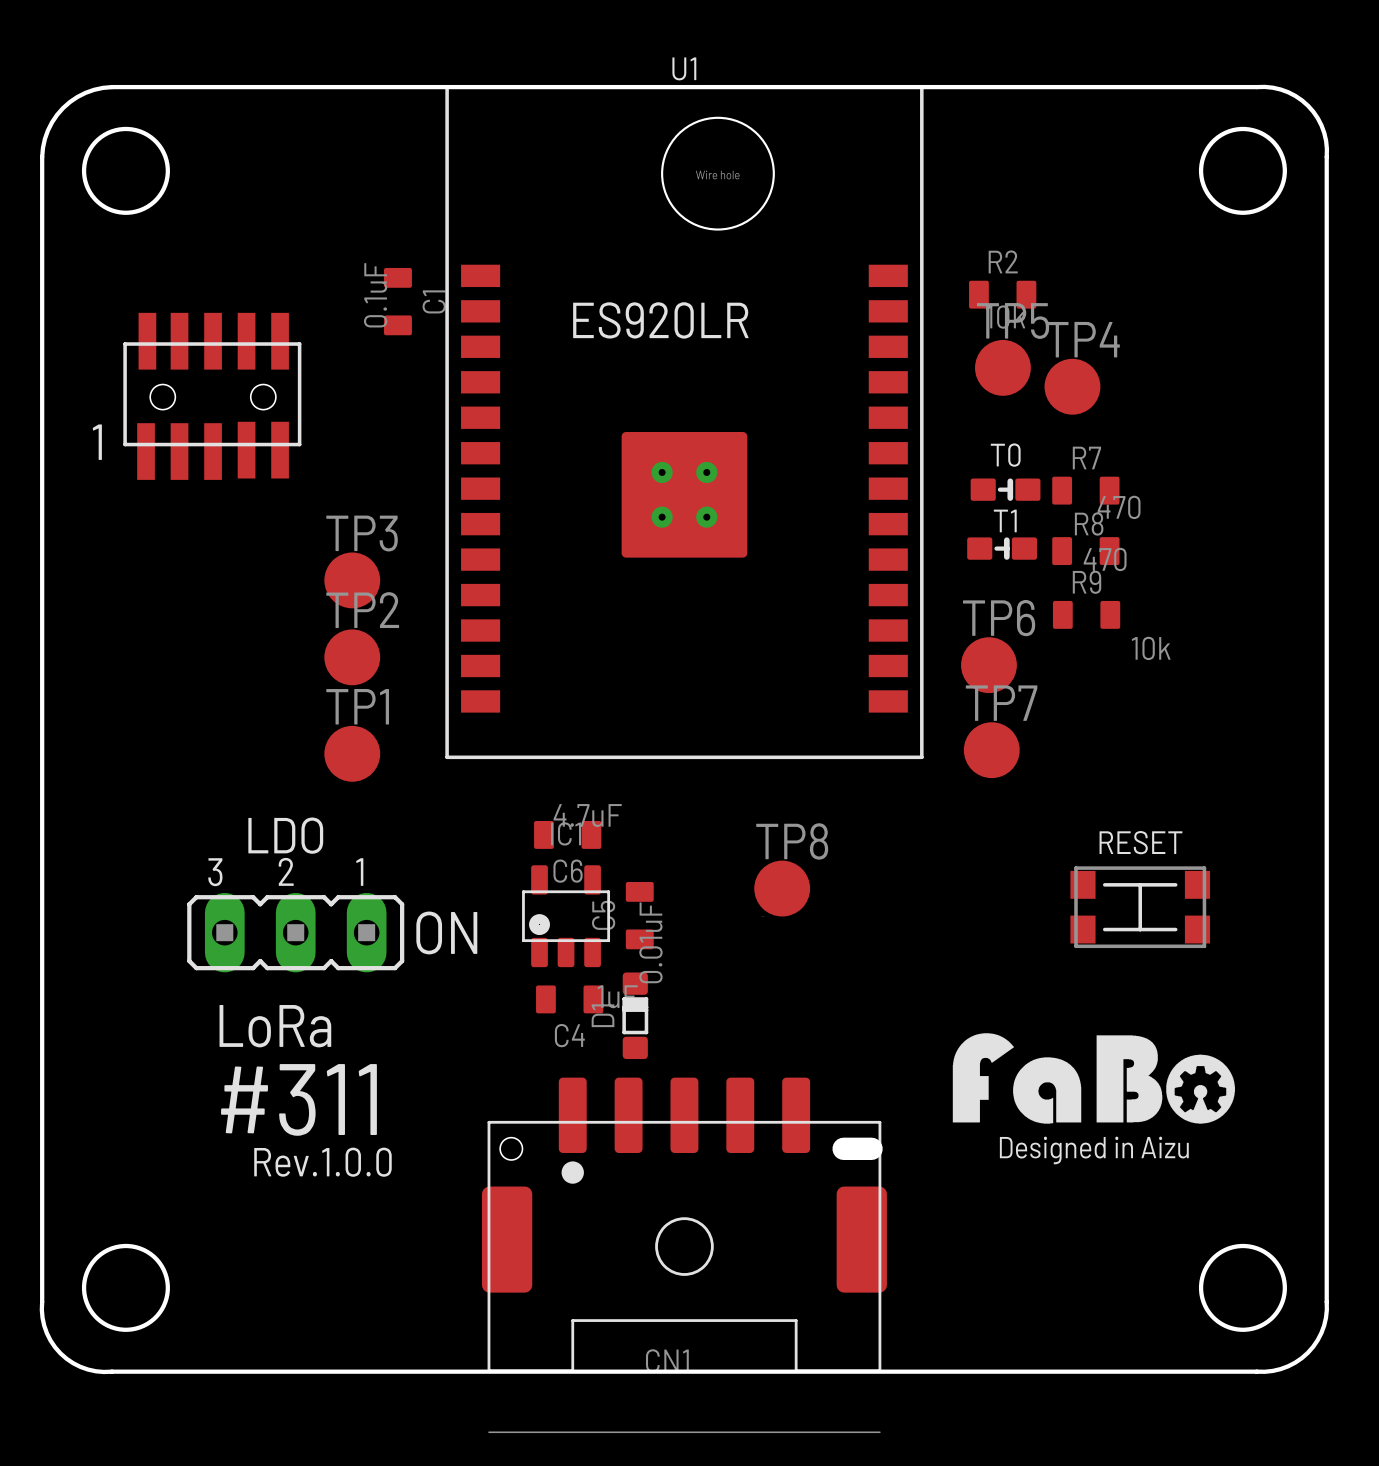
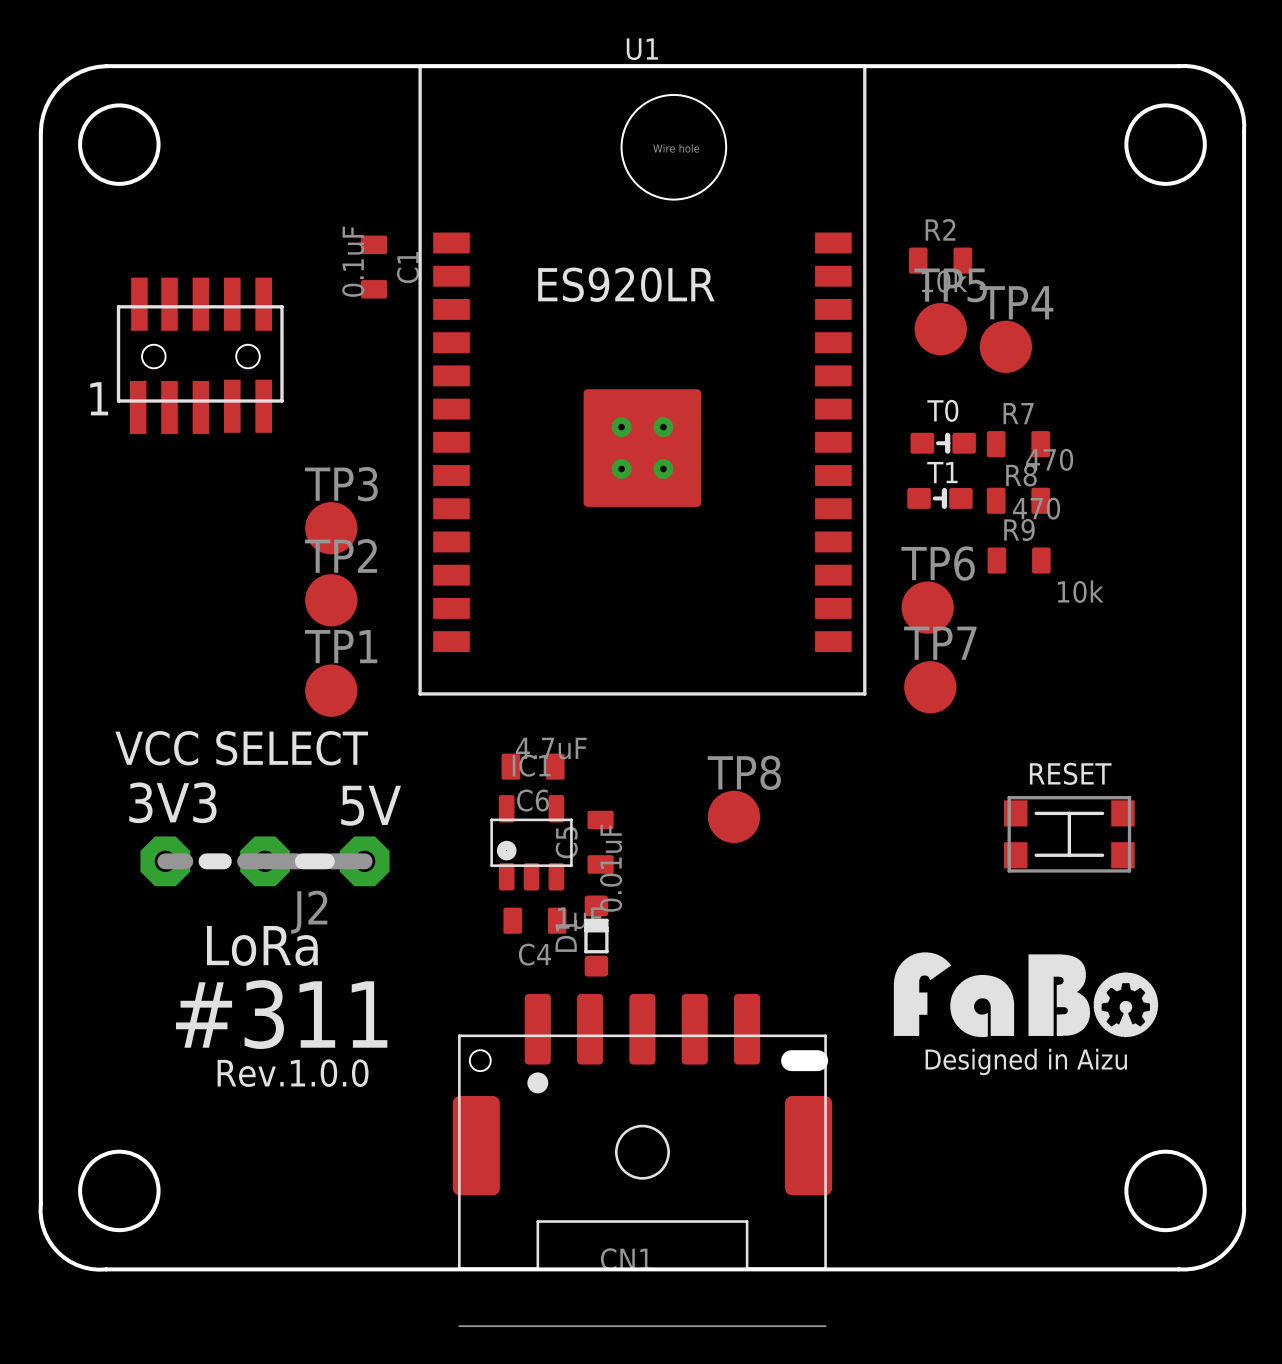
text: none -> VCC SELECT (241, 748)
text: LDO (285, 835) -> none
text: none -> 3V3 (172, 802)
text: none -> 5V (371, 805)
part: (295, 932) -> none
text: ON (446, 932) -> none
J2: none -> (265, 861)

